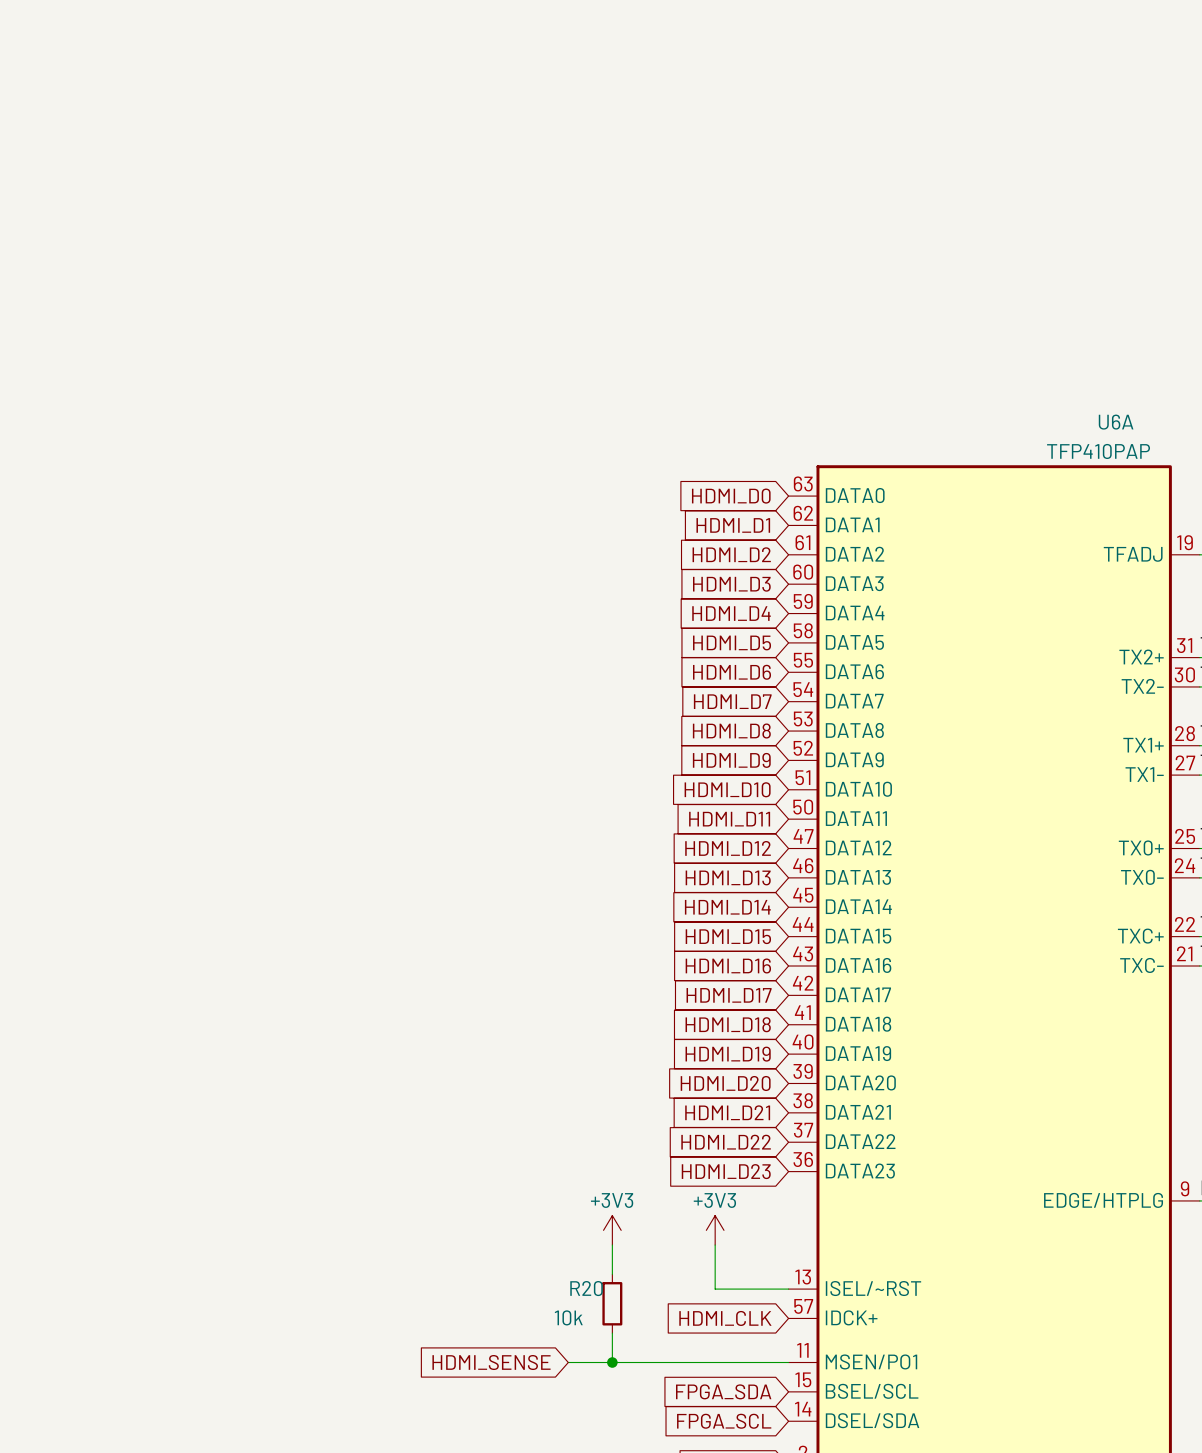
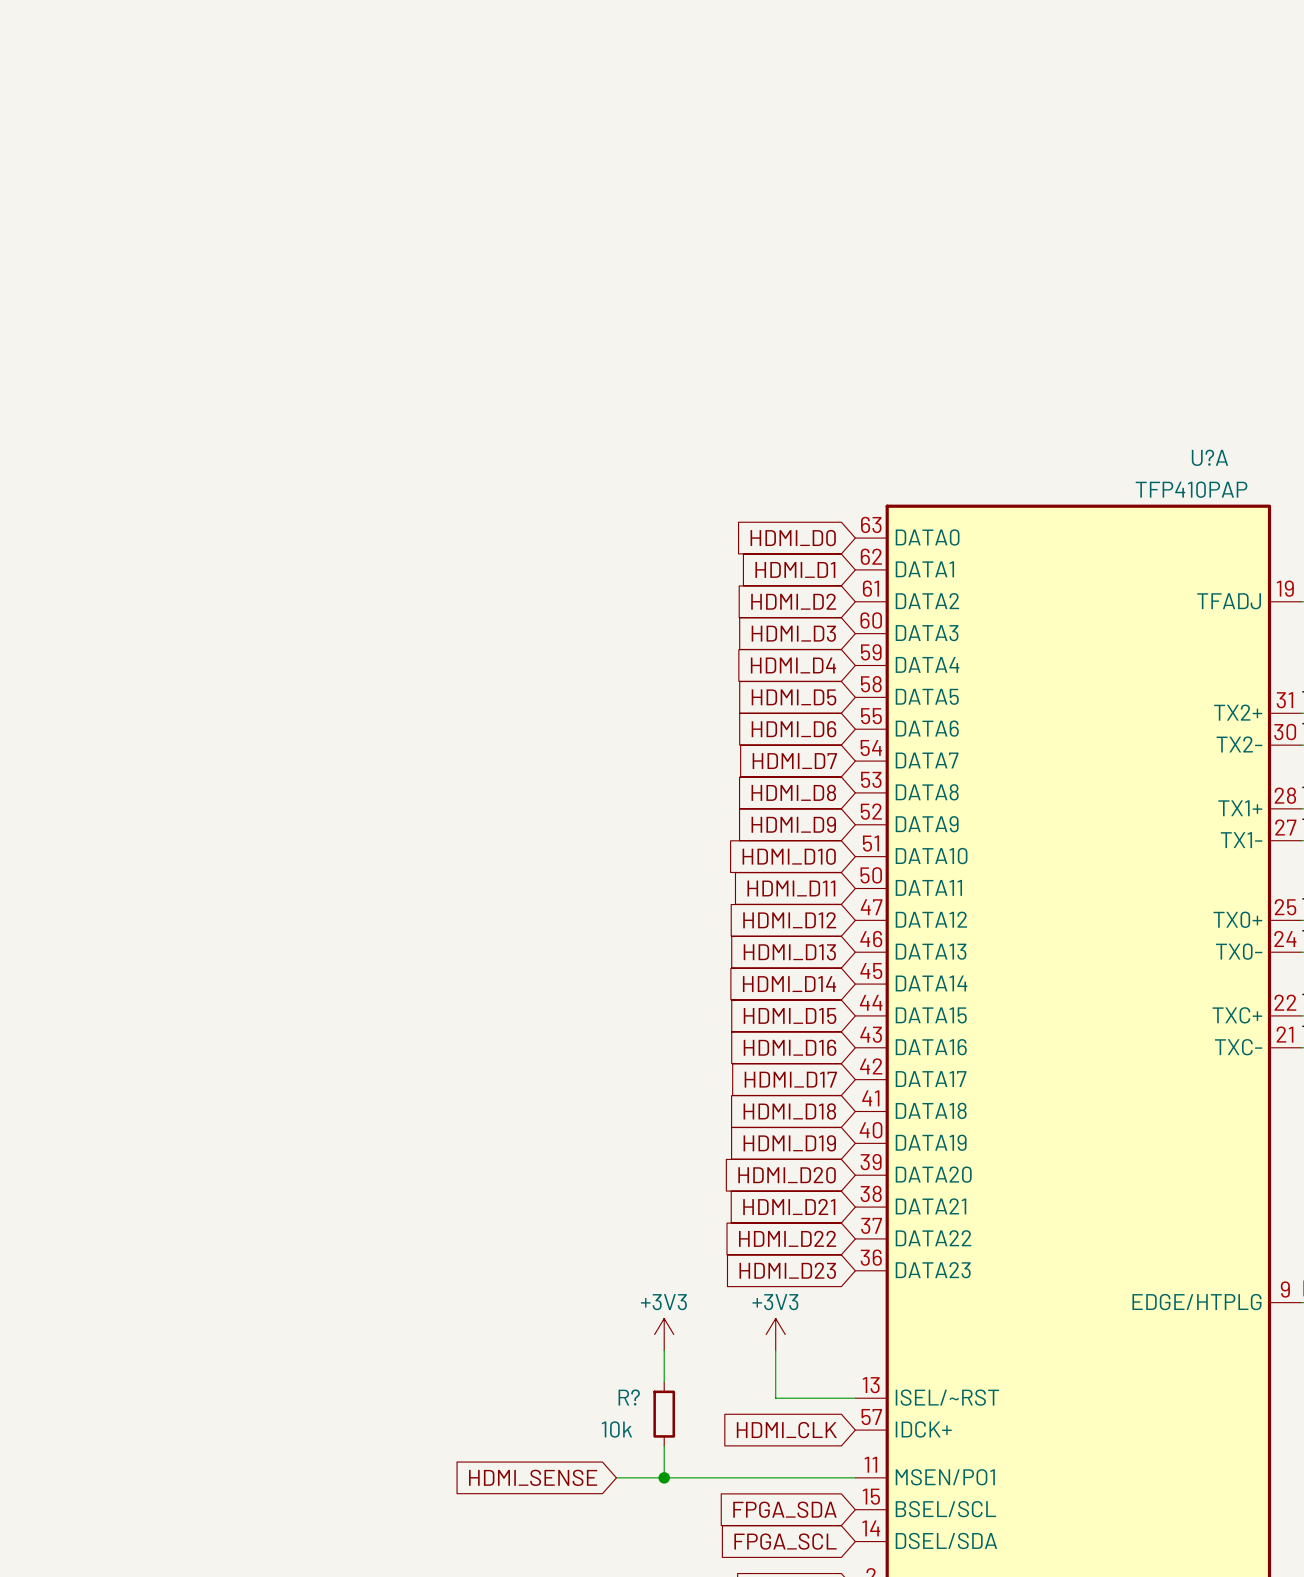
U6A name: U6A (1116, 422) -> U?A (1209, 457)
R20 name: R20 (586, 1288) -> R? (629, 1397)

